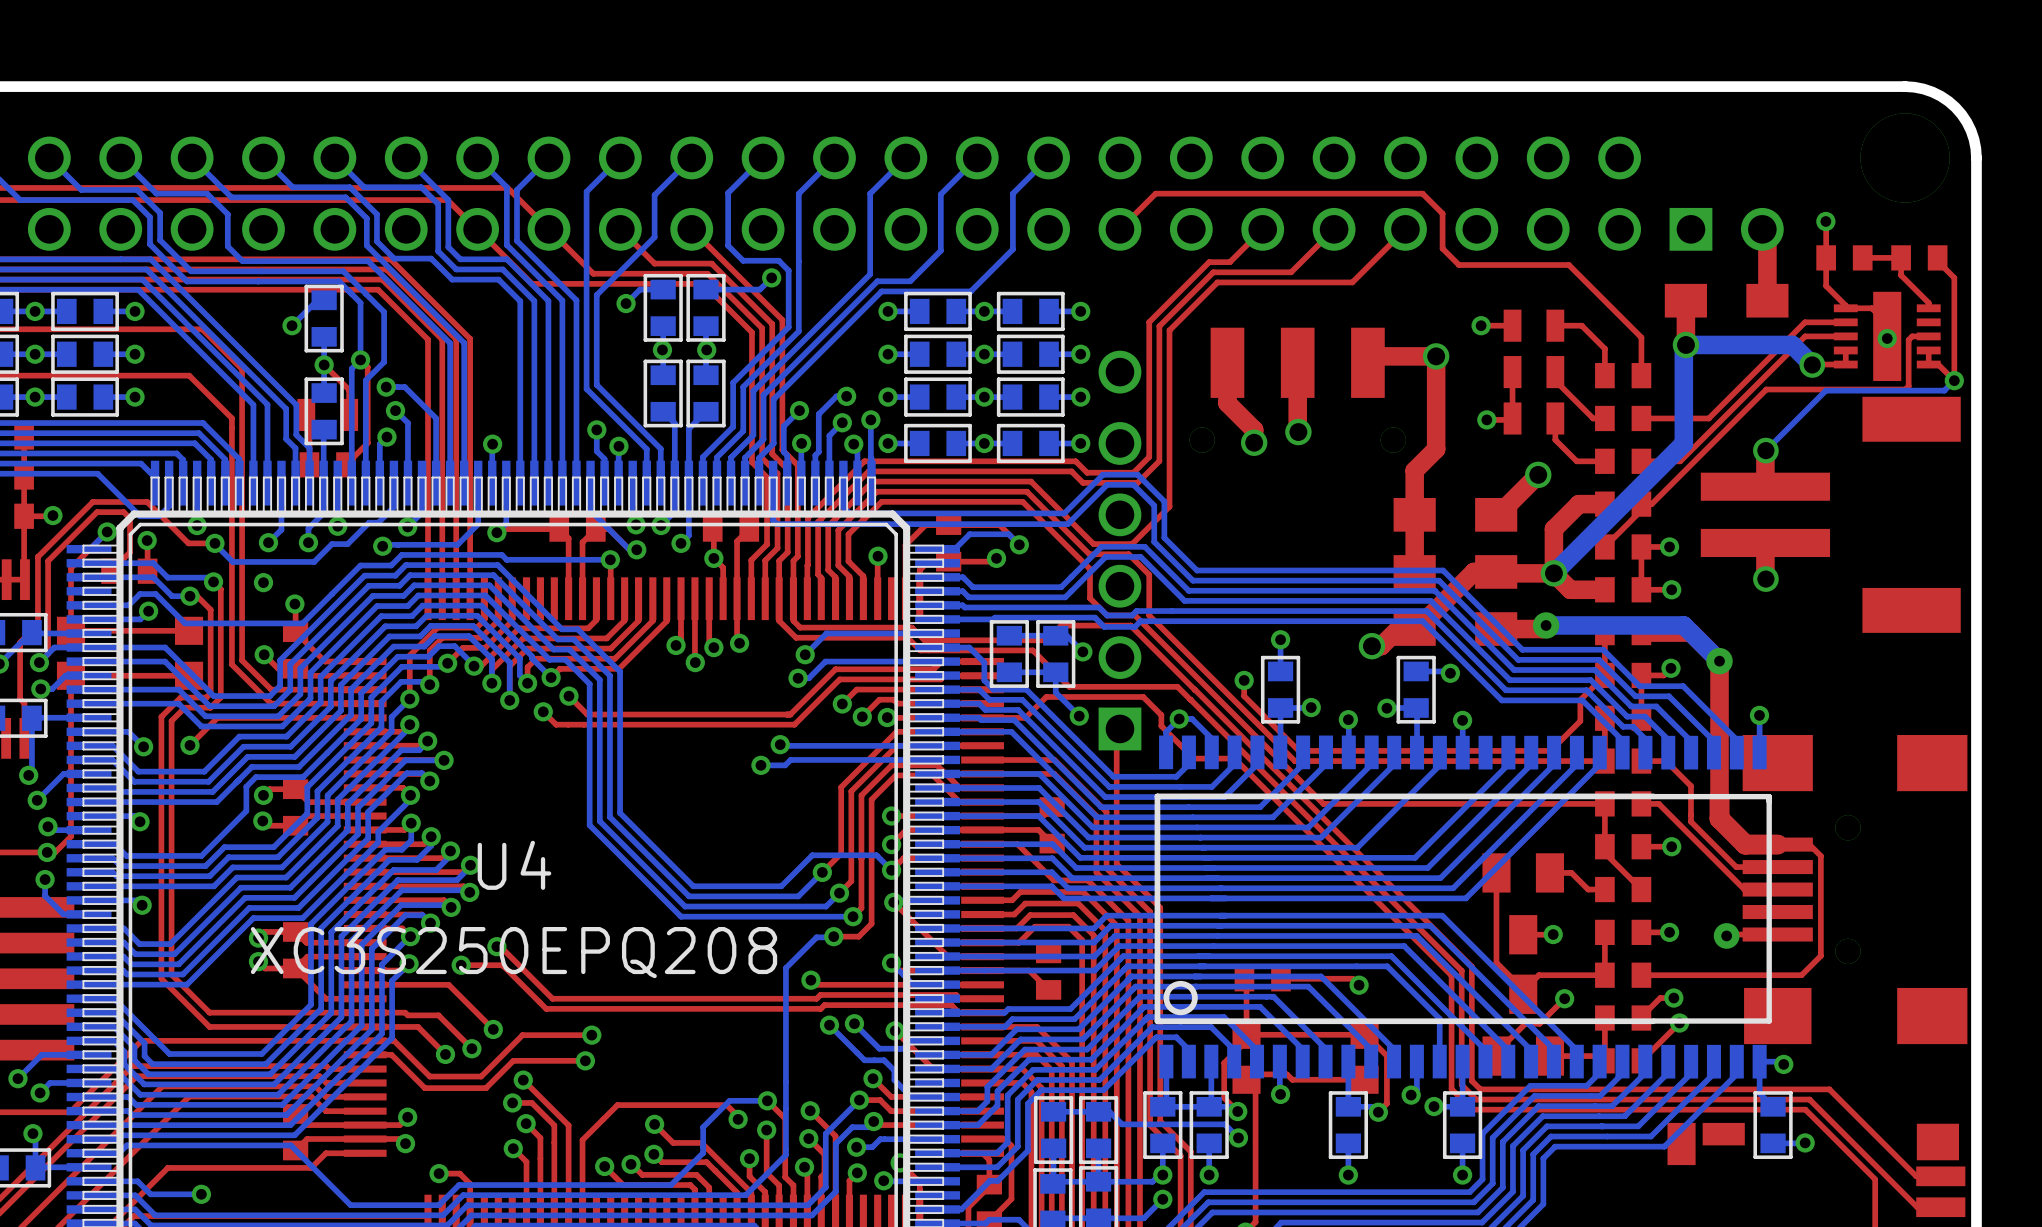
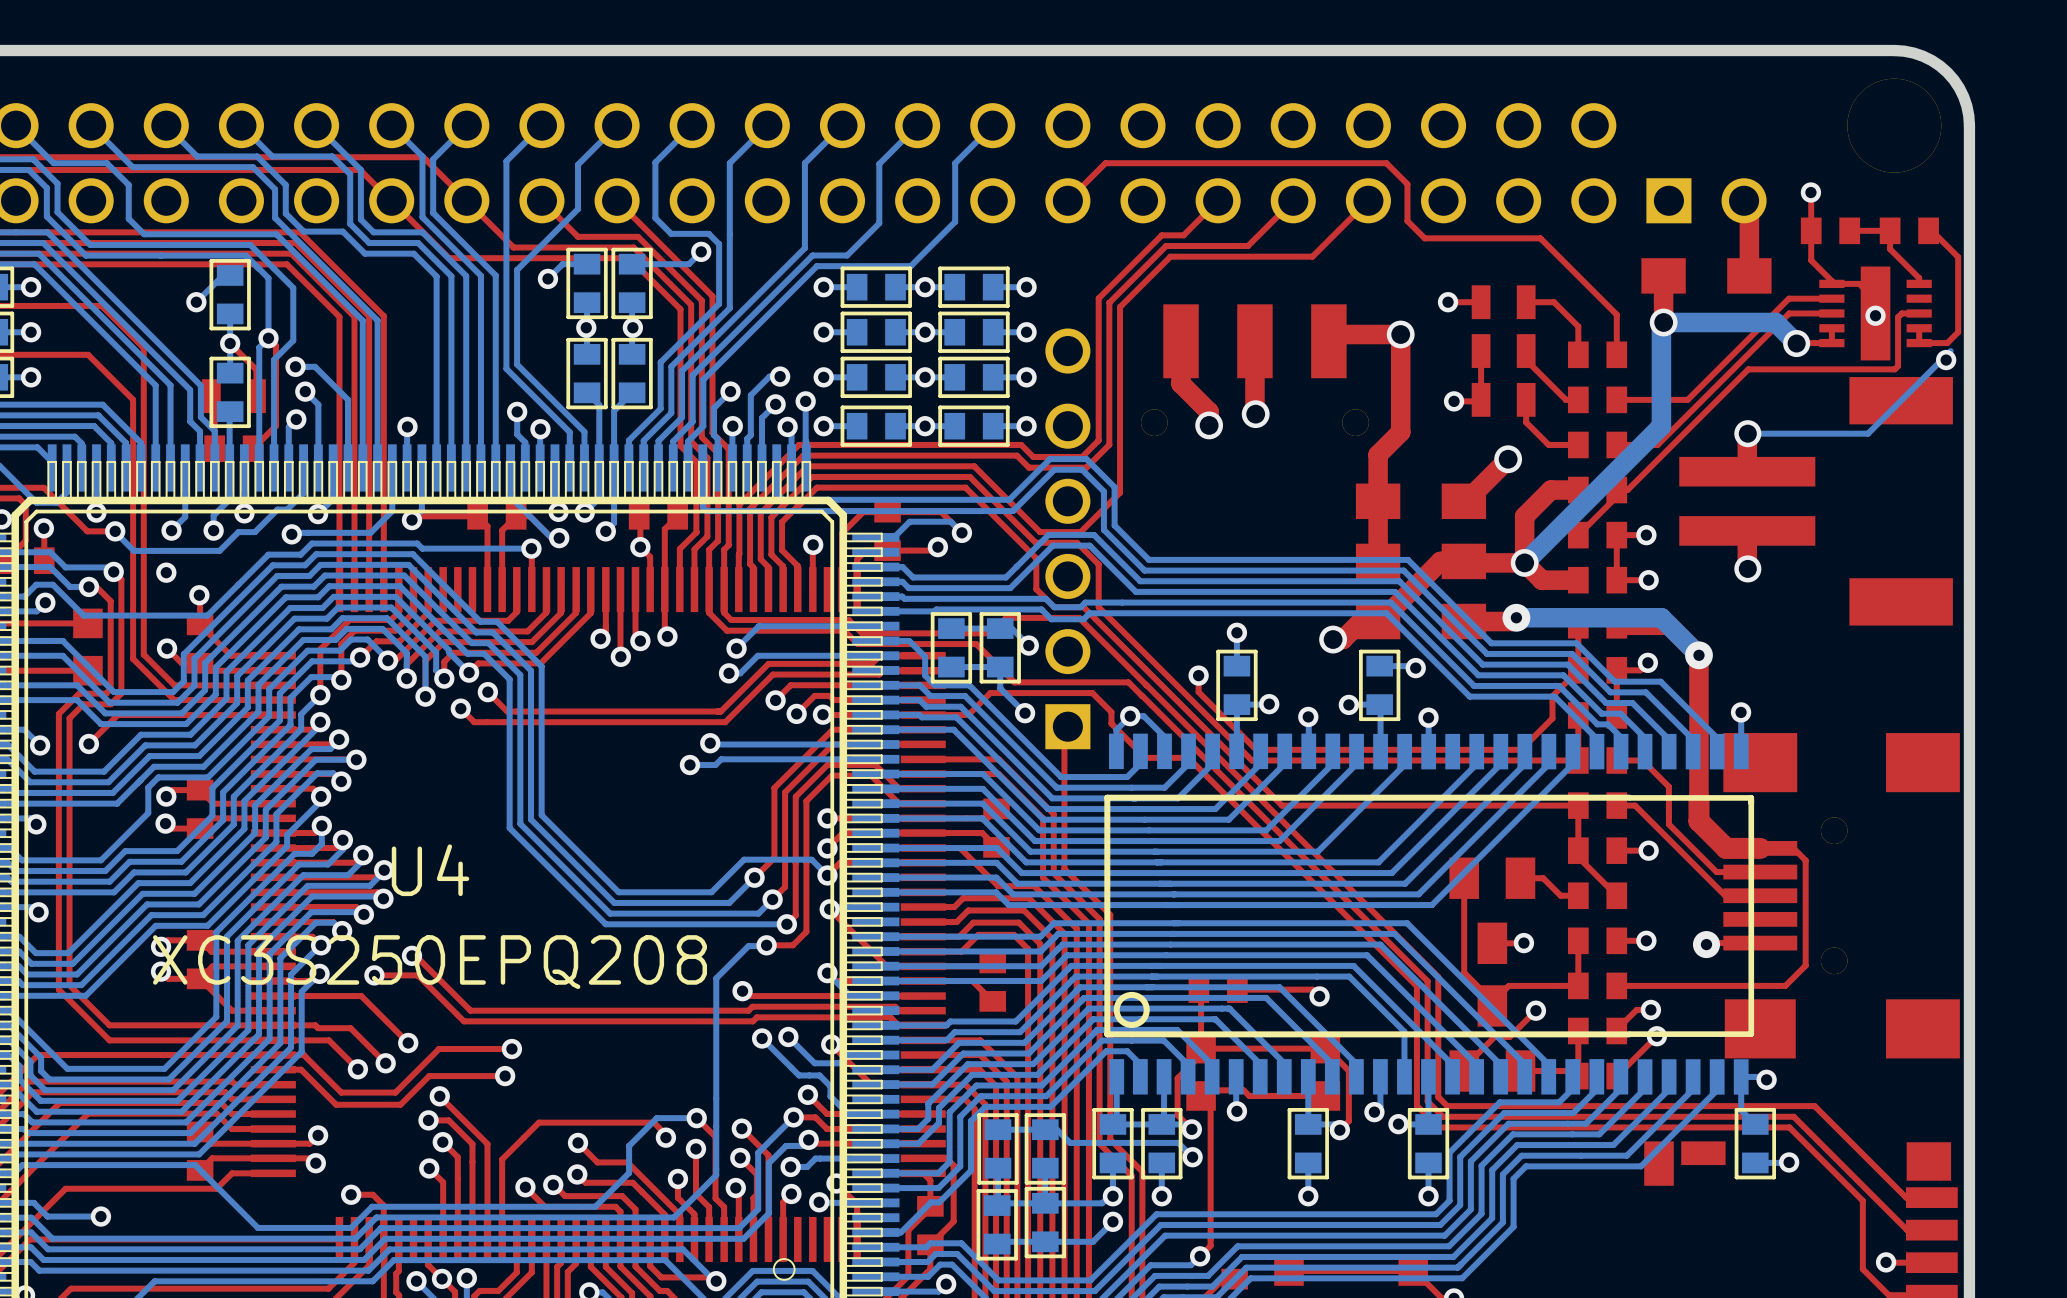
top track: (1937, 257) (1937, 261) (1954, 277) (1954, 380) (1938, 364) -> (1928, 230) (1931, 230) (1958, 257) (1958, 332) (1947, 343) (1929, 343)
bottom track: (1954, 380) (1944, 390) (1825, 390) (1765, 450) -> (1950, 351) (1868, 433) (1747, 433)

